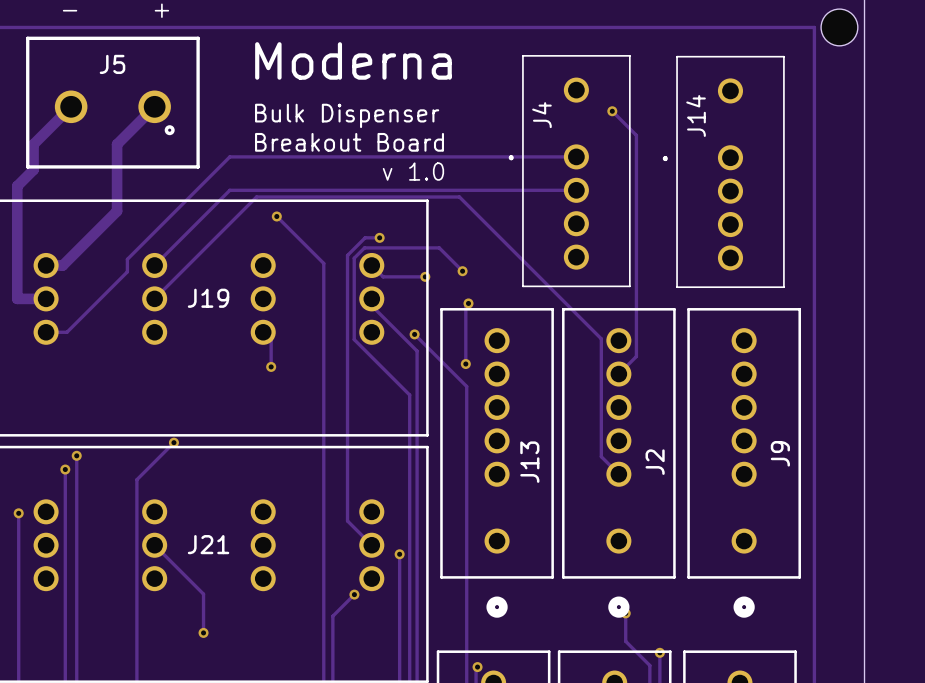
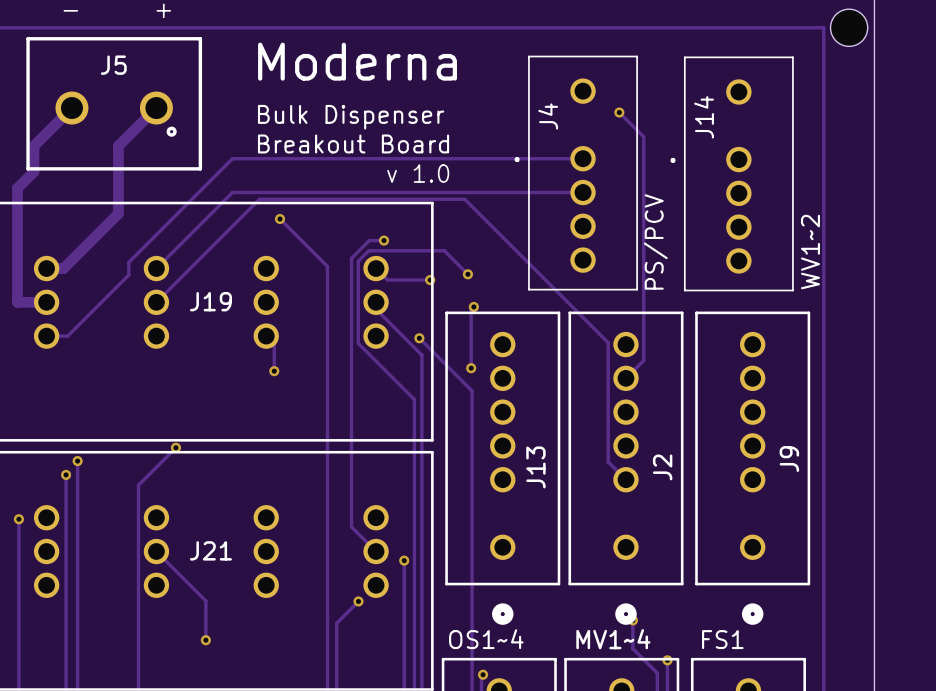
J4 value: none -> PS/PCV (655, 241)
J14 value: none -> WV1~2 (810, 252)
J13 value: none -> OS1~4 (486, 639)
J2 value: none -> MV1~4 (613, 639)
J9 value: none -> FS1 (722, 639)

